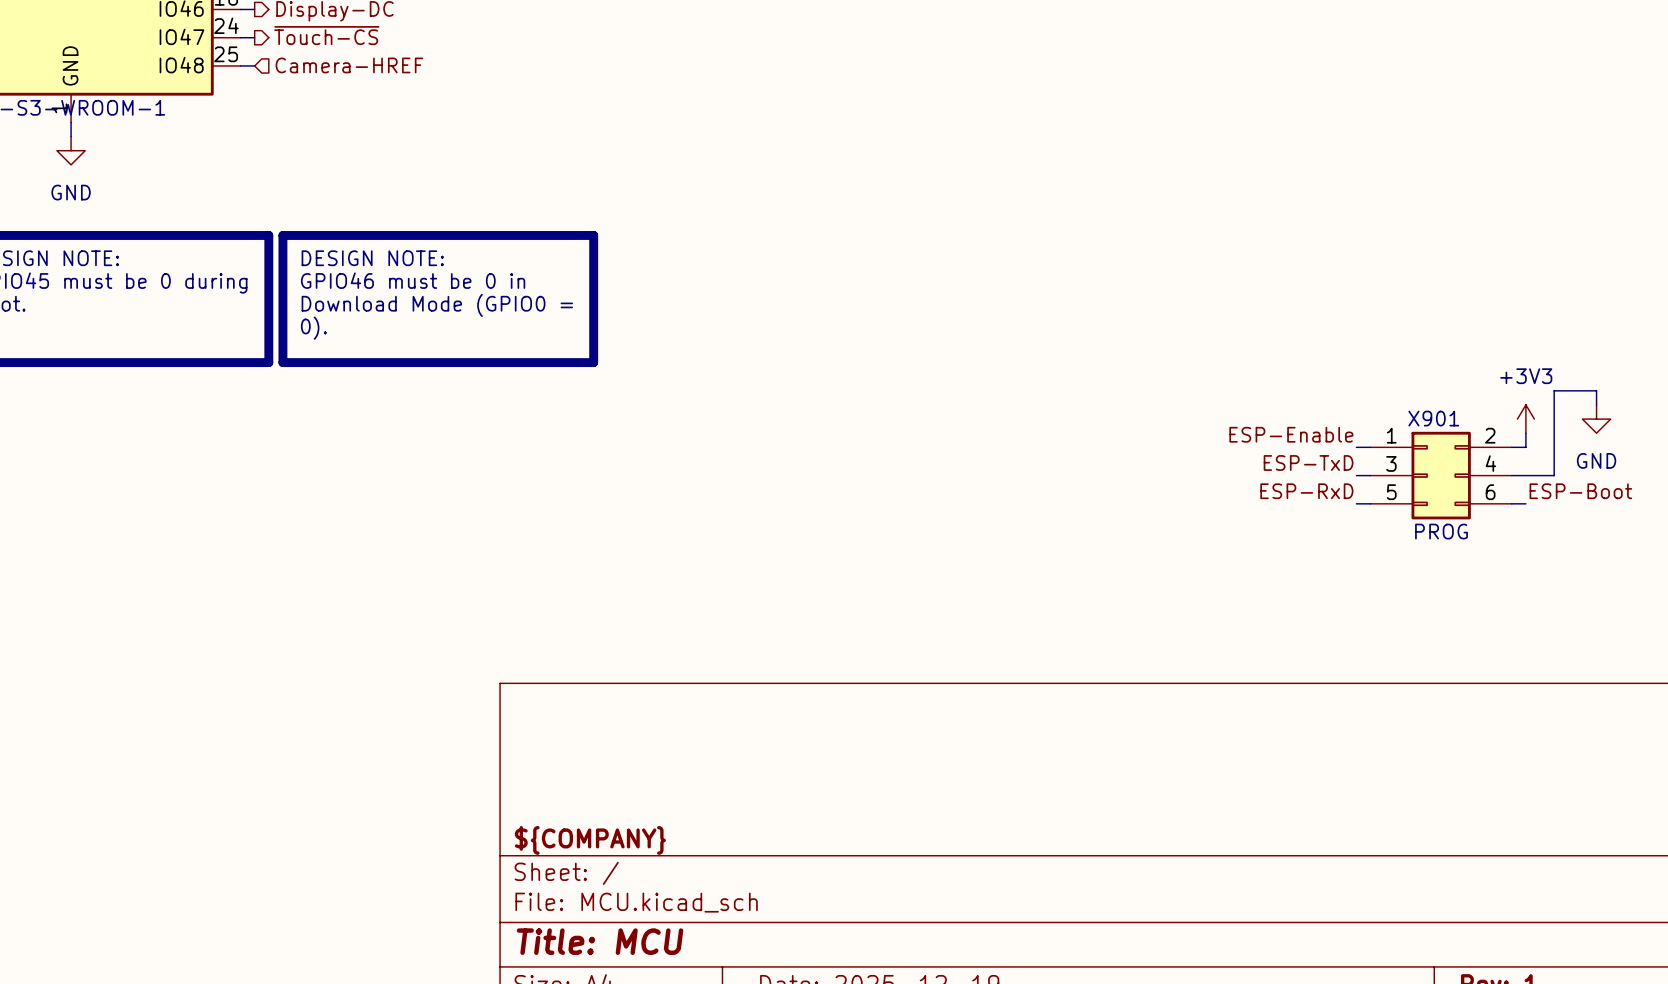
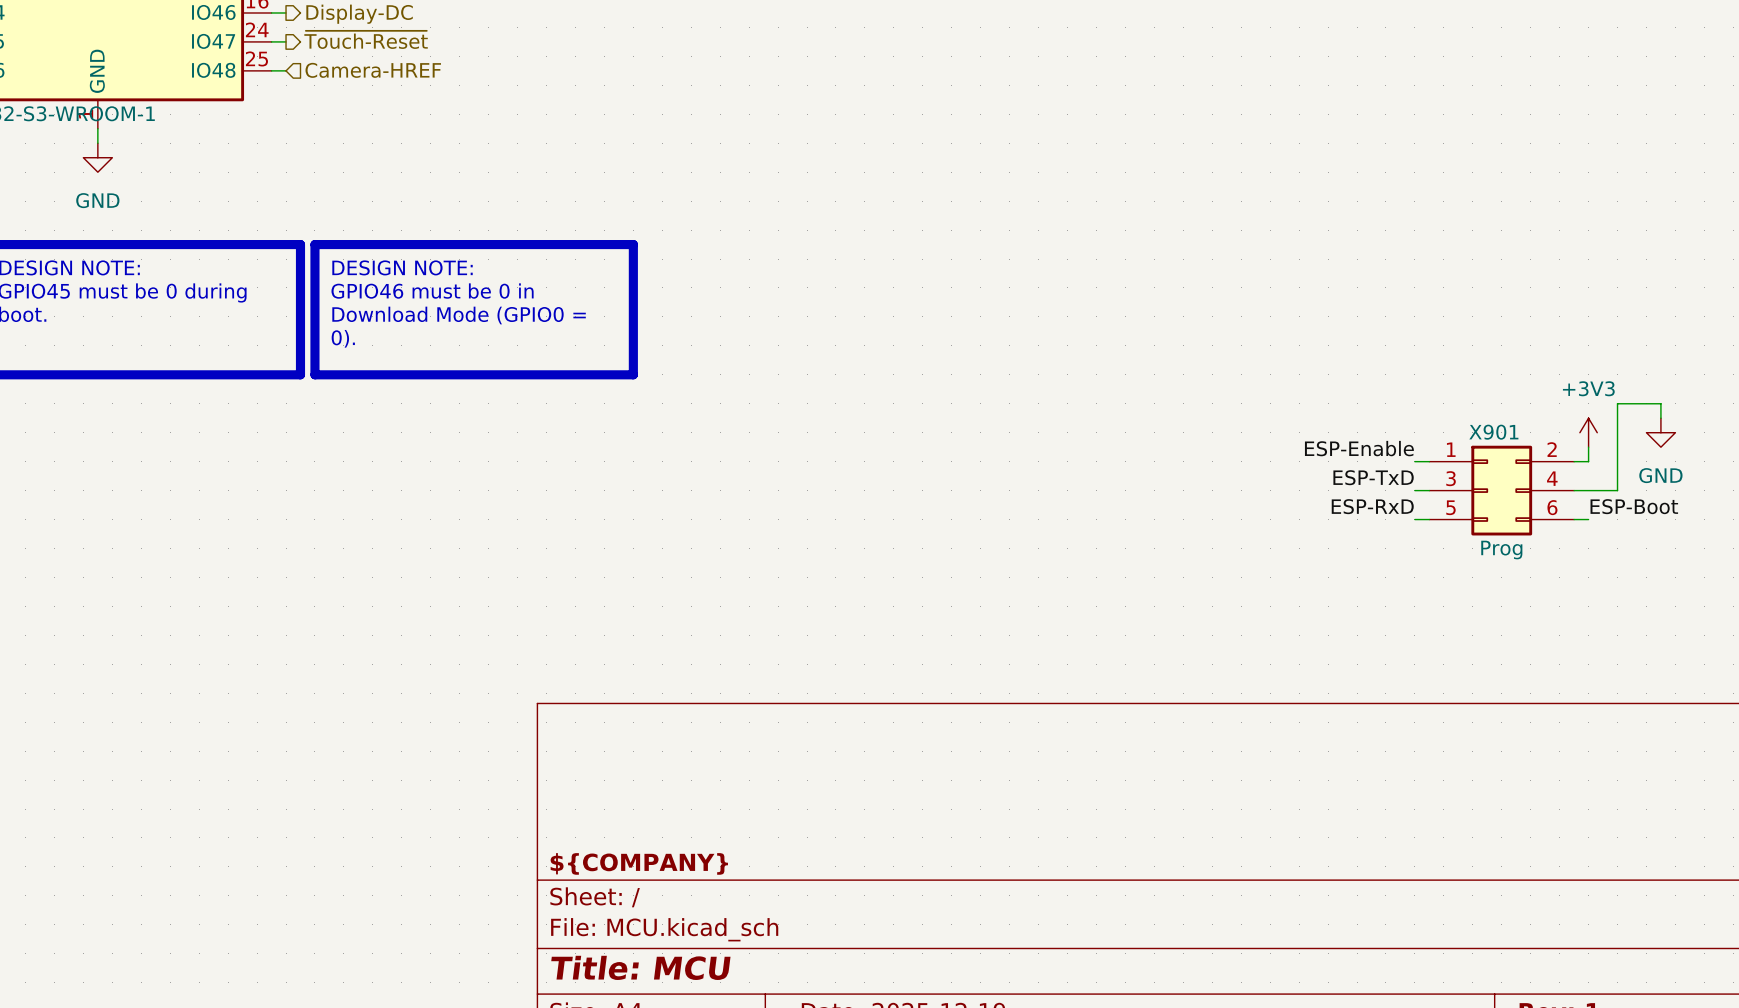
hierarchical label: ~{Touch-CS} (326, 35) -> ~{Touch-Reset} (366, 39)
X901 value: PROG (1441, 531) -> Prog (1501, 550)

